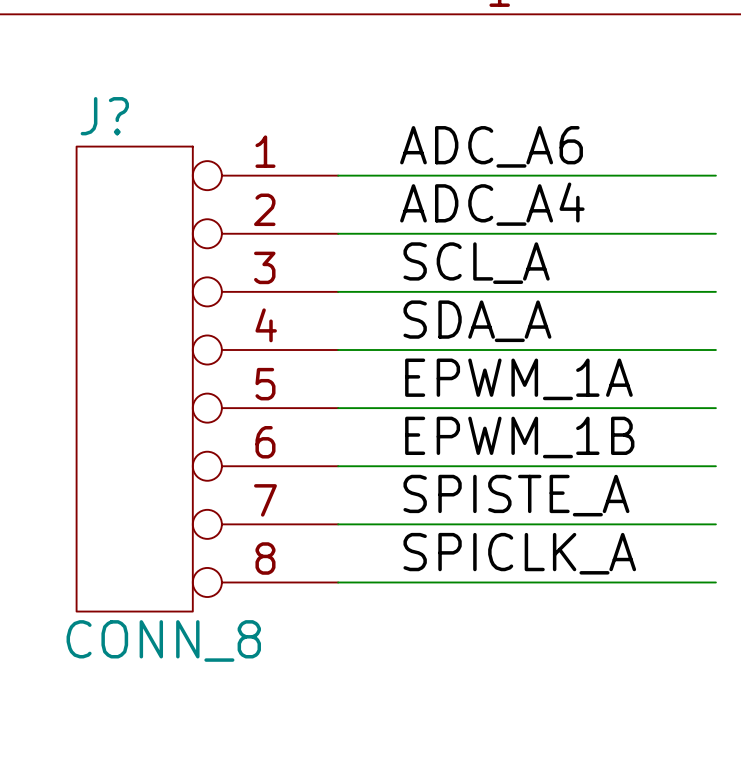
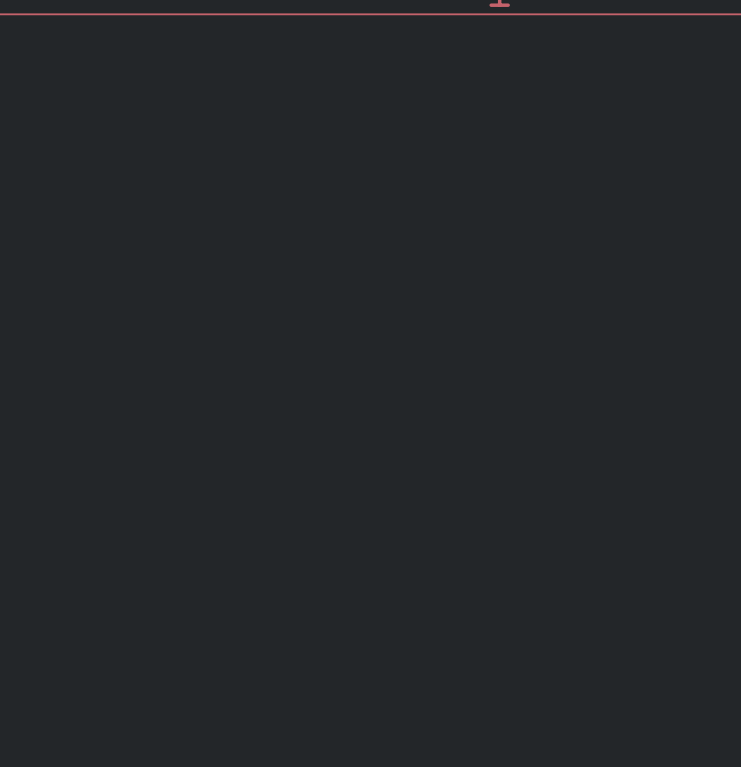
label: ADC_A6 (491, 146) -> none
wire: (338, 175) (715, 175) -> none
label: ADC_A4 (492, 204) -> none
wire: (338, 233) (715, 233) -> none
label: SCL_A (476, 263) -> none
wire: (338, 291) (715, 291) -> none
label: SDA_A (477, 321) -> none
wire: (338, 350) (715, 350) -> none
J?: CONN_8 (207, 379) -> none
label: EPWM_1A (518, 379) -> none
wire: (338, 408) (715, 408) -> none
label: EPWM_1B (519, 437) -> none
wire: (338, 466) (715, 466) -> none
label: SPISTE_A (516, 495) -> none
wire: (338, 524) (715, 524) -> none
label: SPICLK_A (519, 553) -> none
wire: (338, 582) (715, 582) -> none

